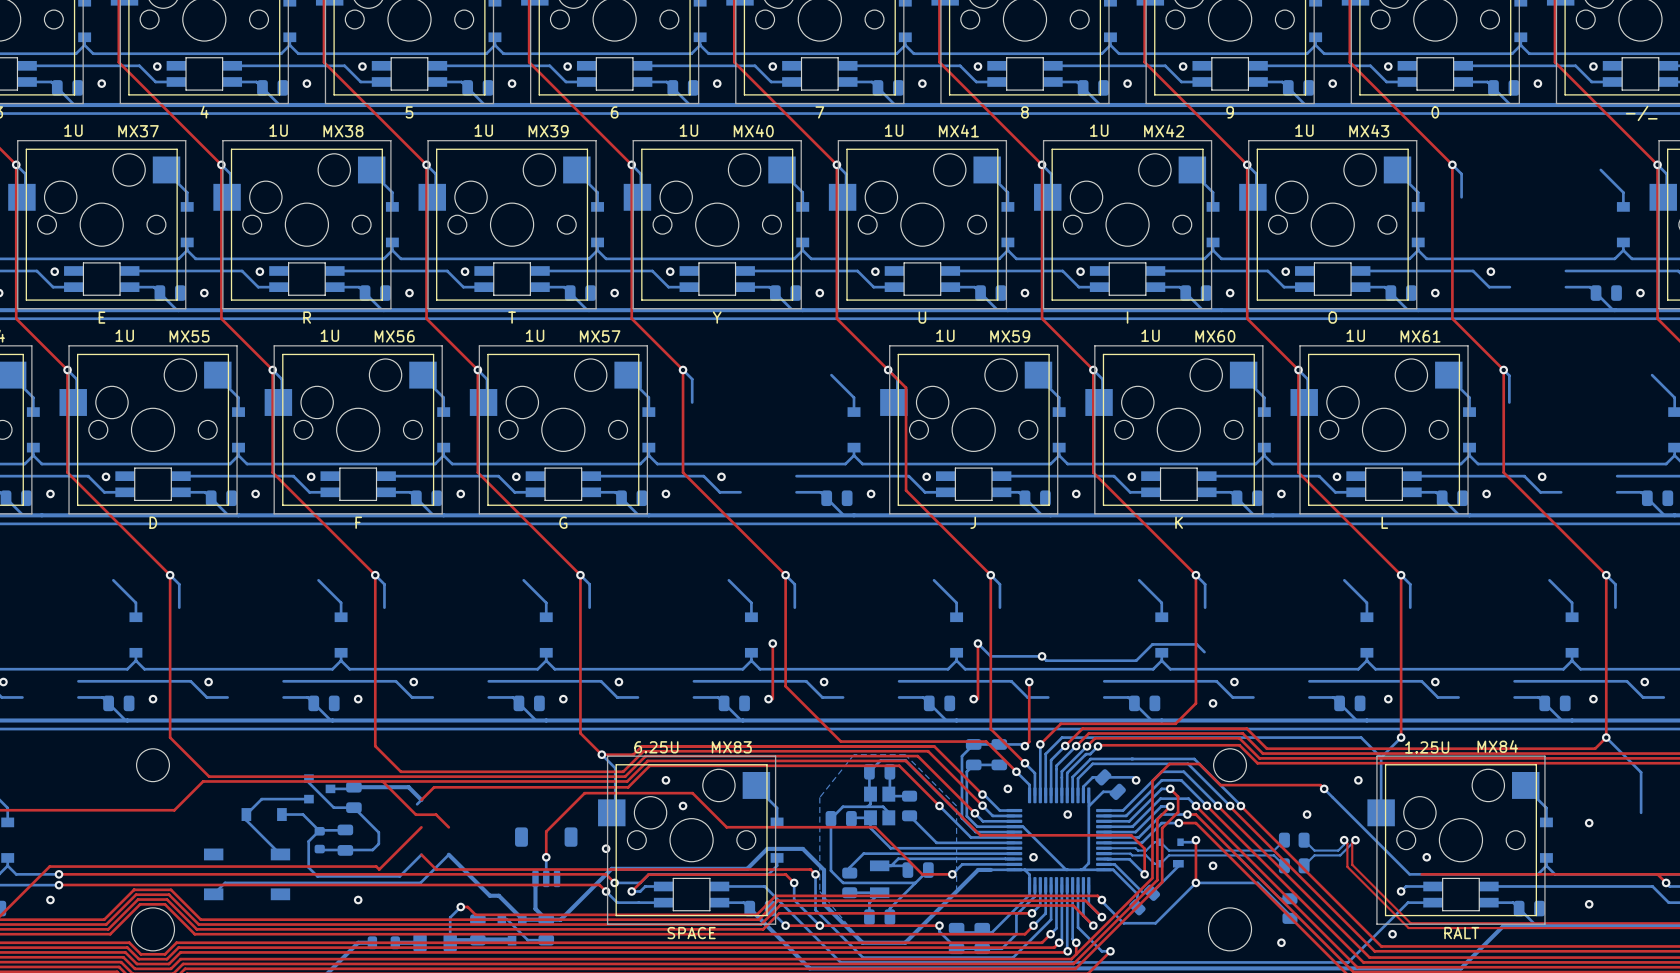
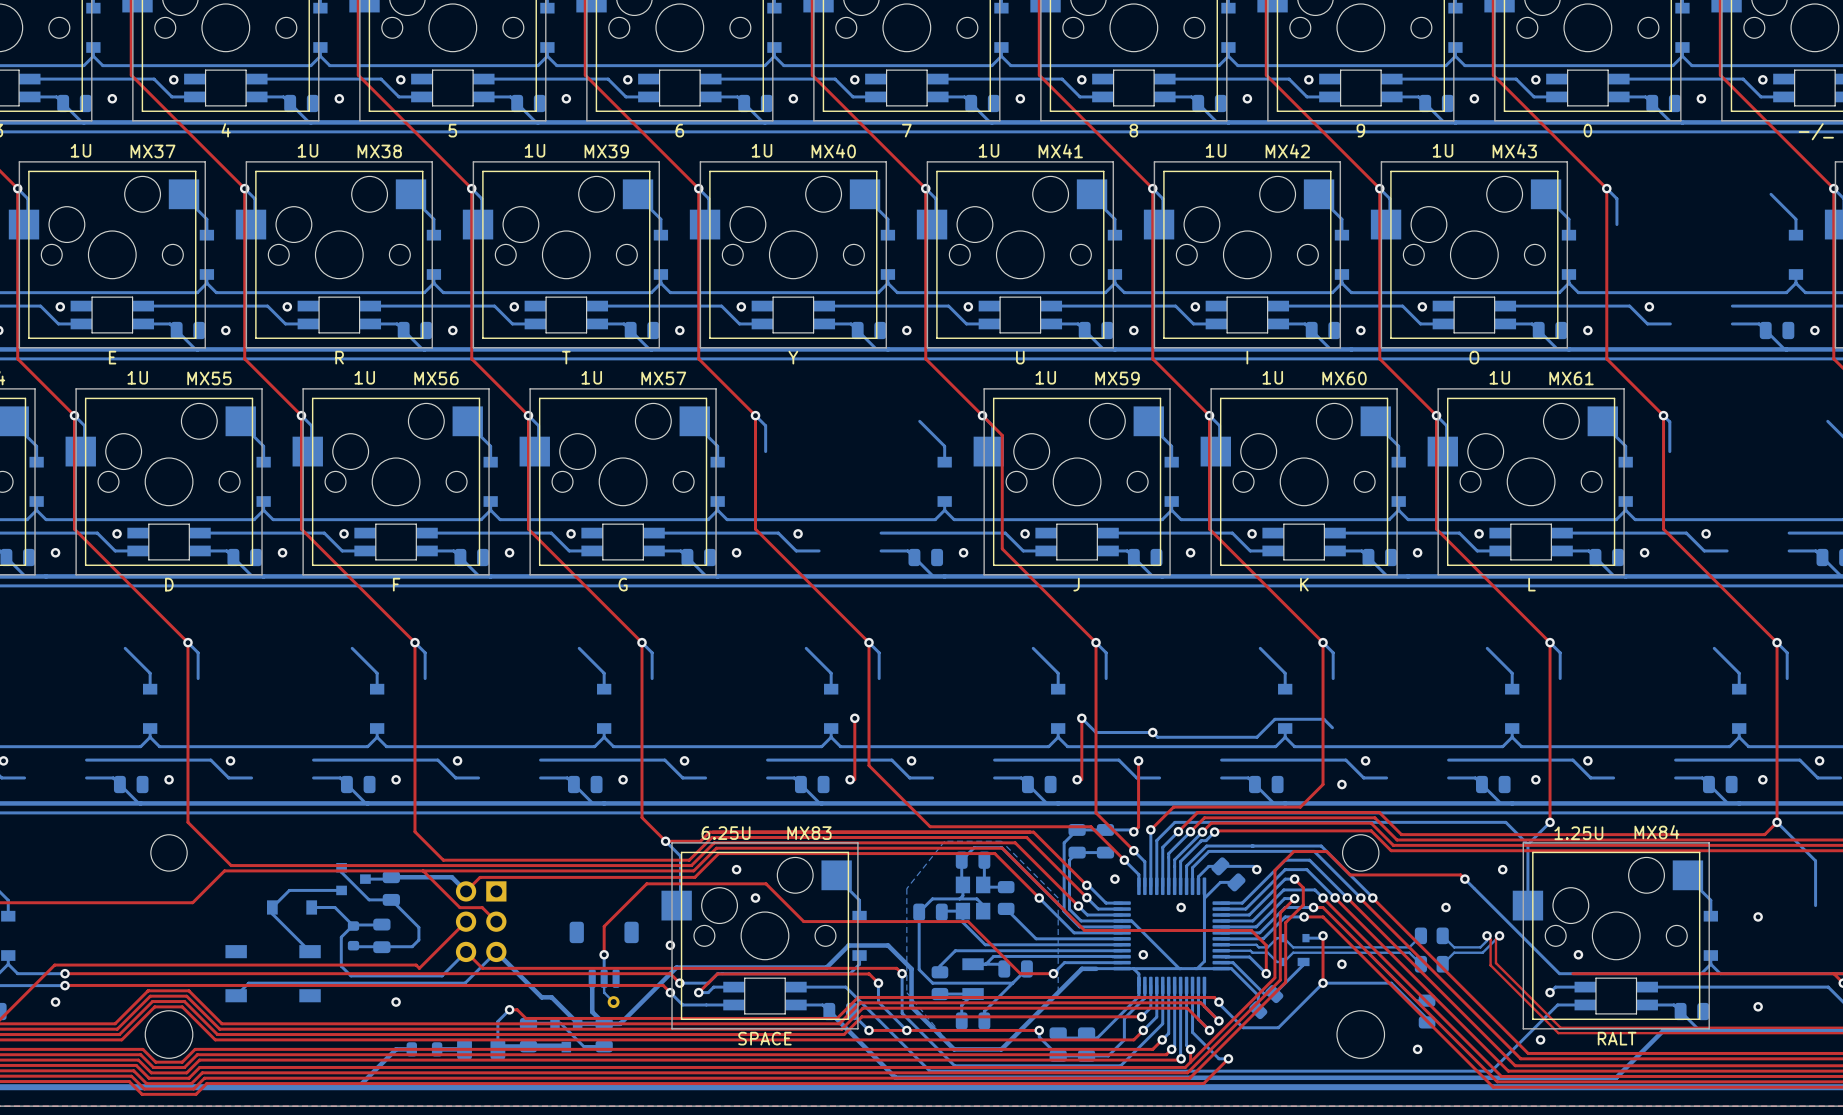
part: none -> (481, 921)
bottom track: none -> (604, 978) (604, 992) (613, 1002)
part: none -> (613, 1002)

